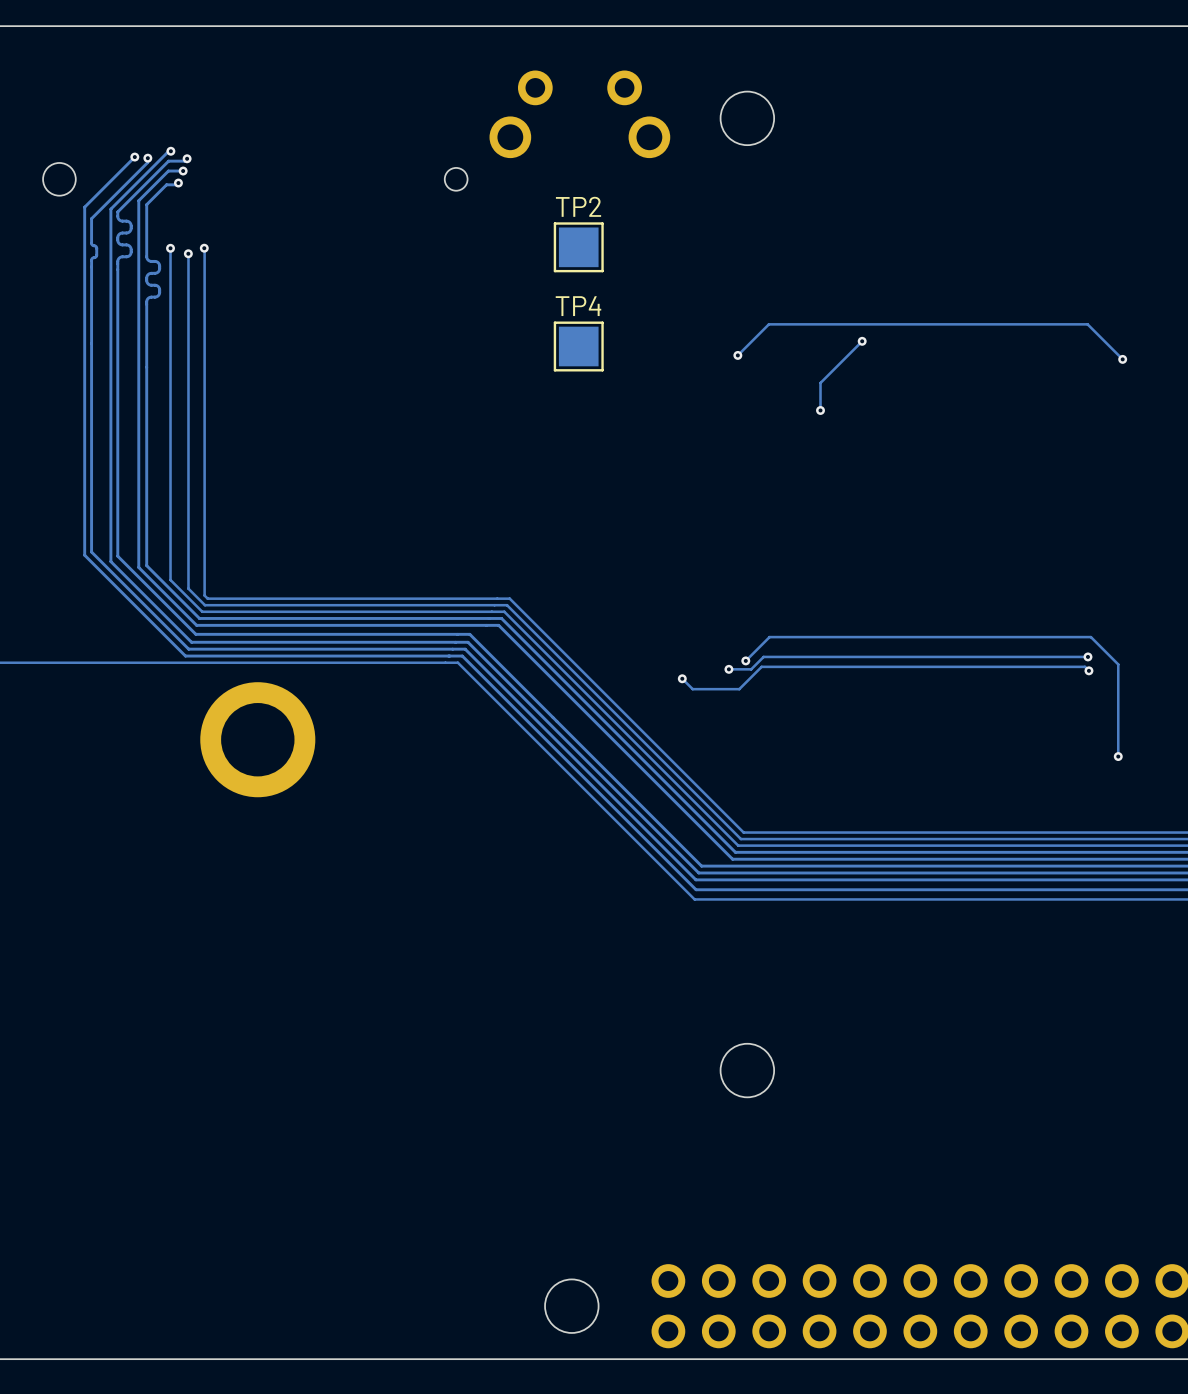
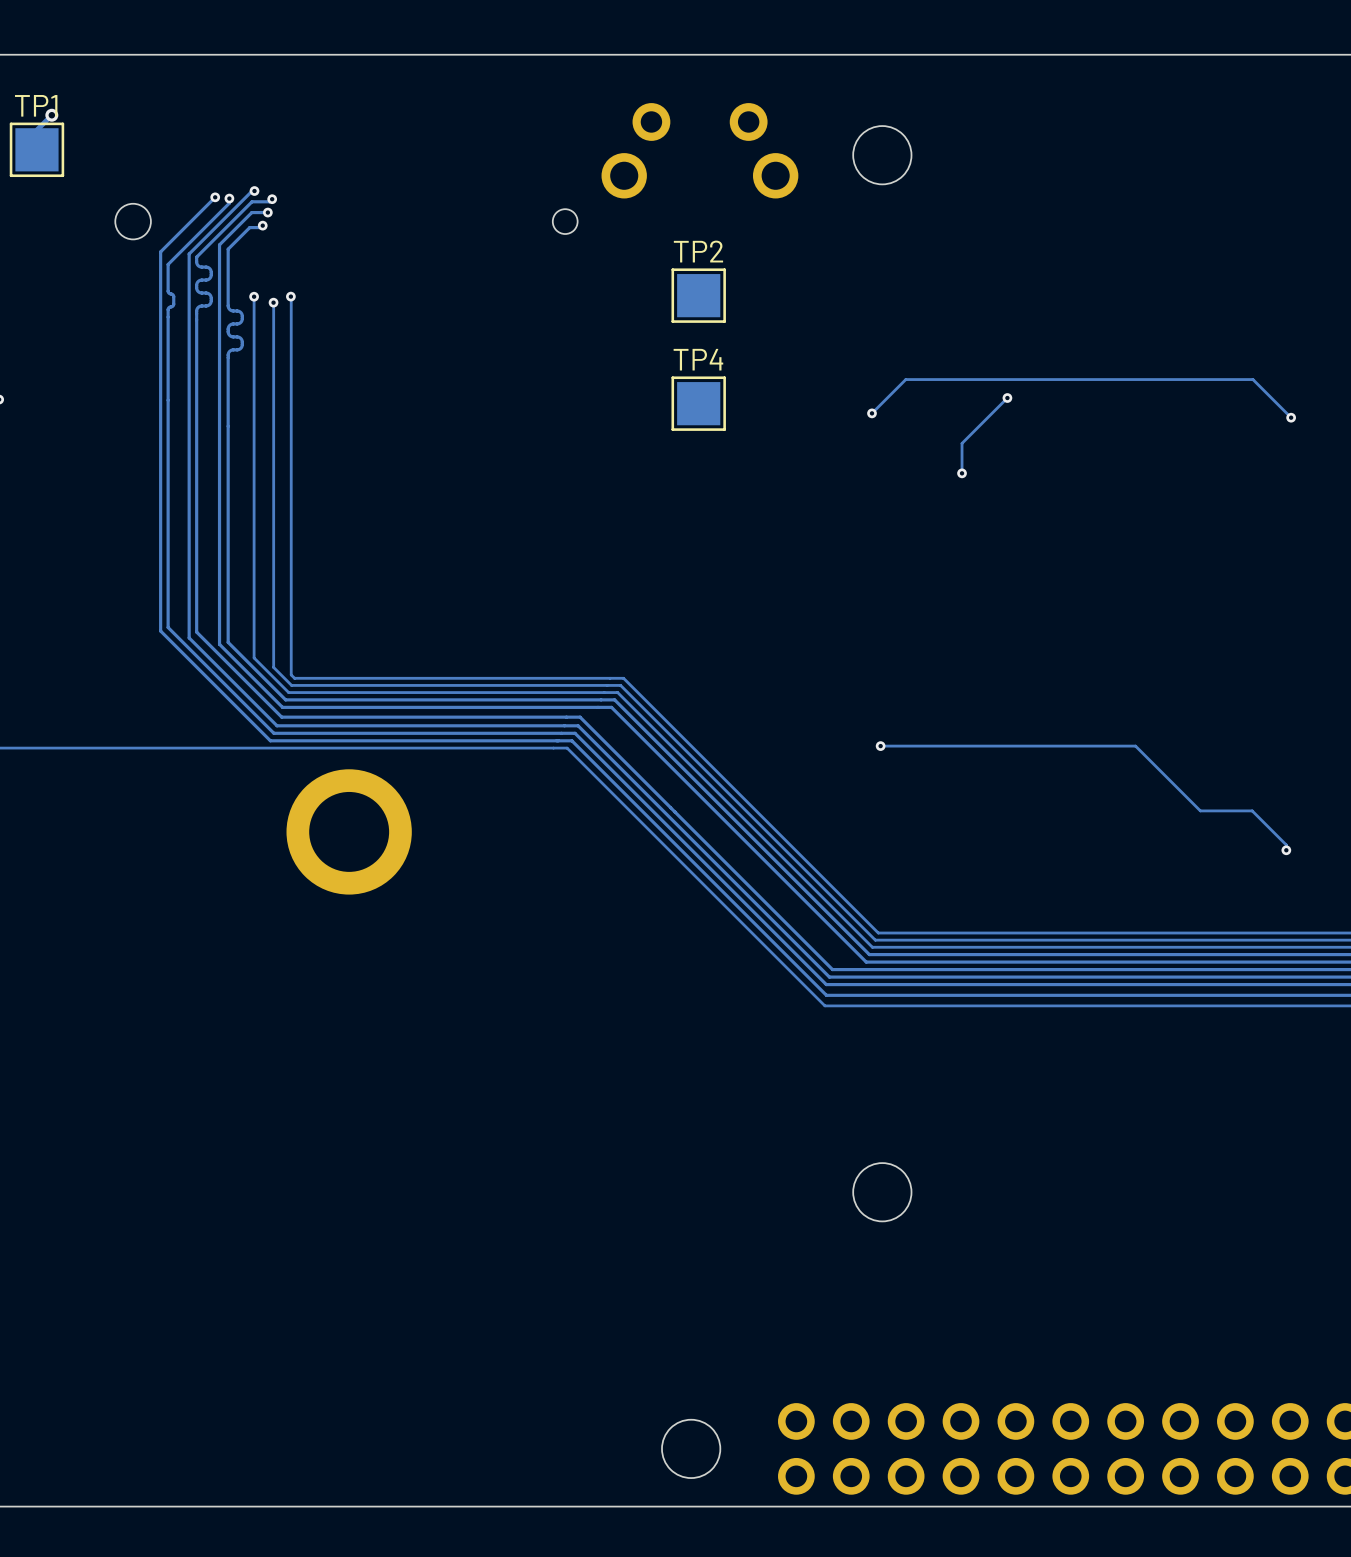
track: (1087, 656) (763, 656) (751, 669) (728, 669) -> none
via: (1087, 656) -> none
track: (745, 660) (769, 637) (1090, 637) (1118, 664) (1118, 751) -> (880, 746) (1135, 746) (1200, 810) (1252, 810) (1286, 845)
via: (728, 669) -> none
track: (1088, 670) (1084, 666) (761, 666) (739, 689) (692, 689) (682, 678) -> none
via: (1088, 670) -> none
via: (682, 678) -> none

